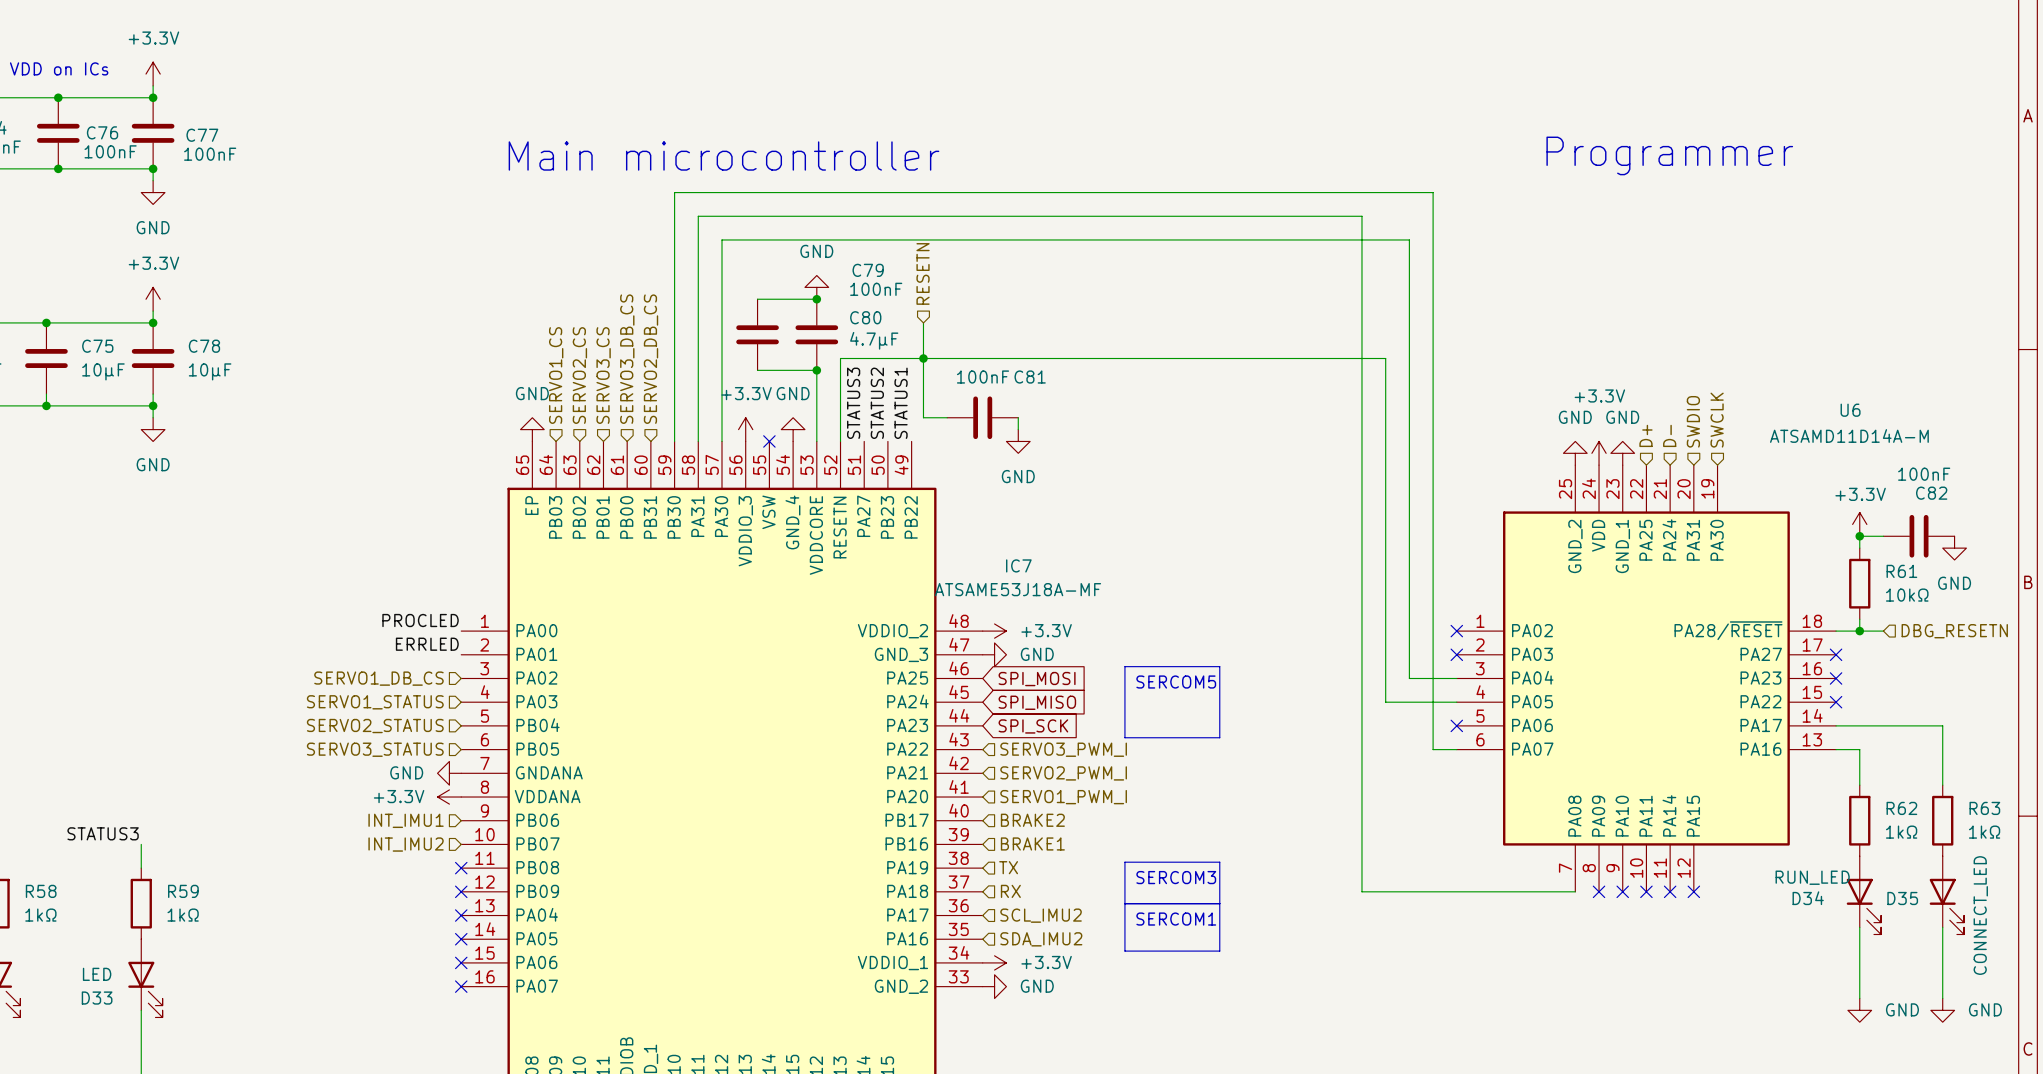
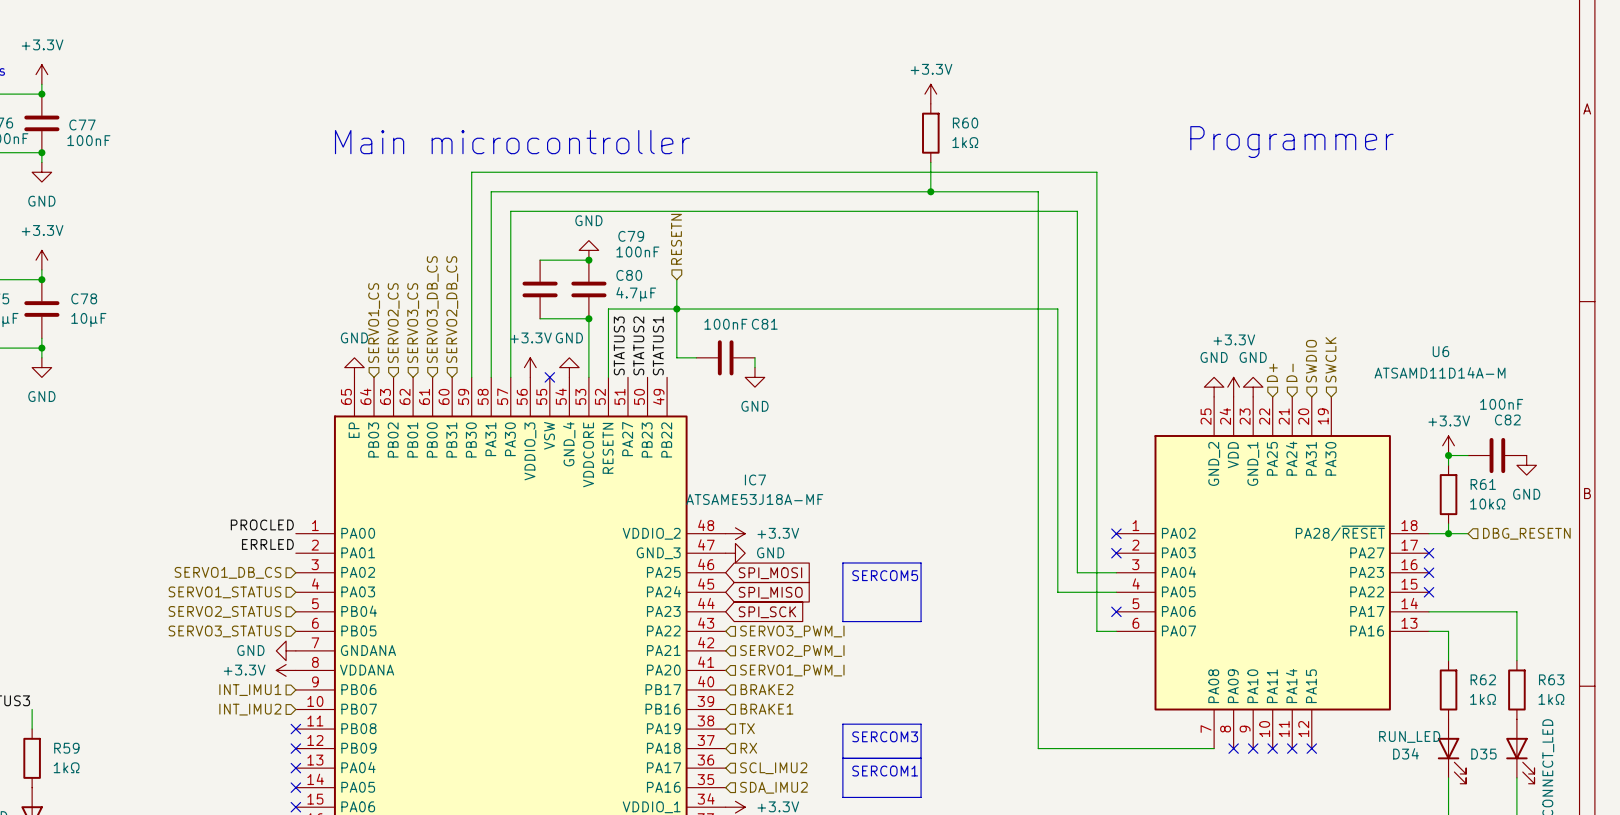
power symbol: none -> +3.3V (930, 94)
R60: none -> 1kΩ (930, 133)
wire: none -> (930, 162) (930, 191)
junction: none -> (930, 191)

